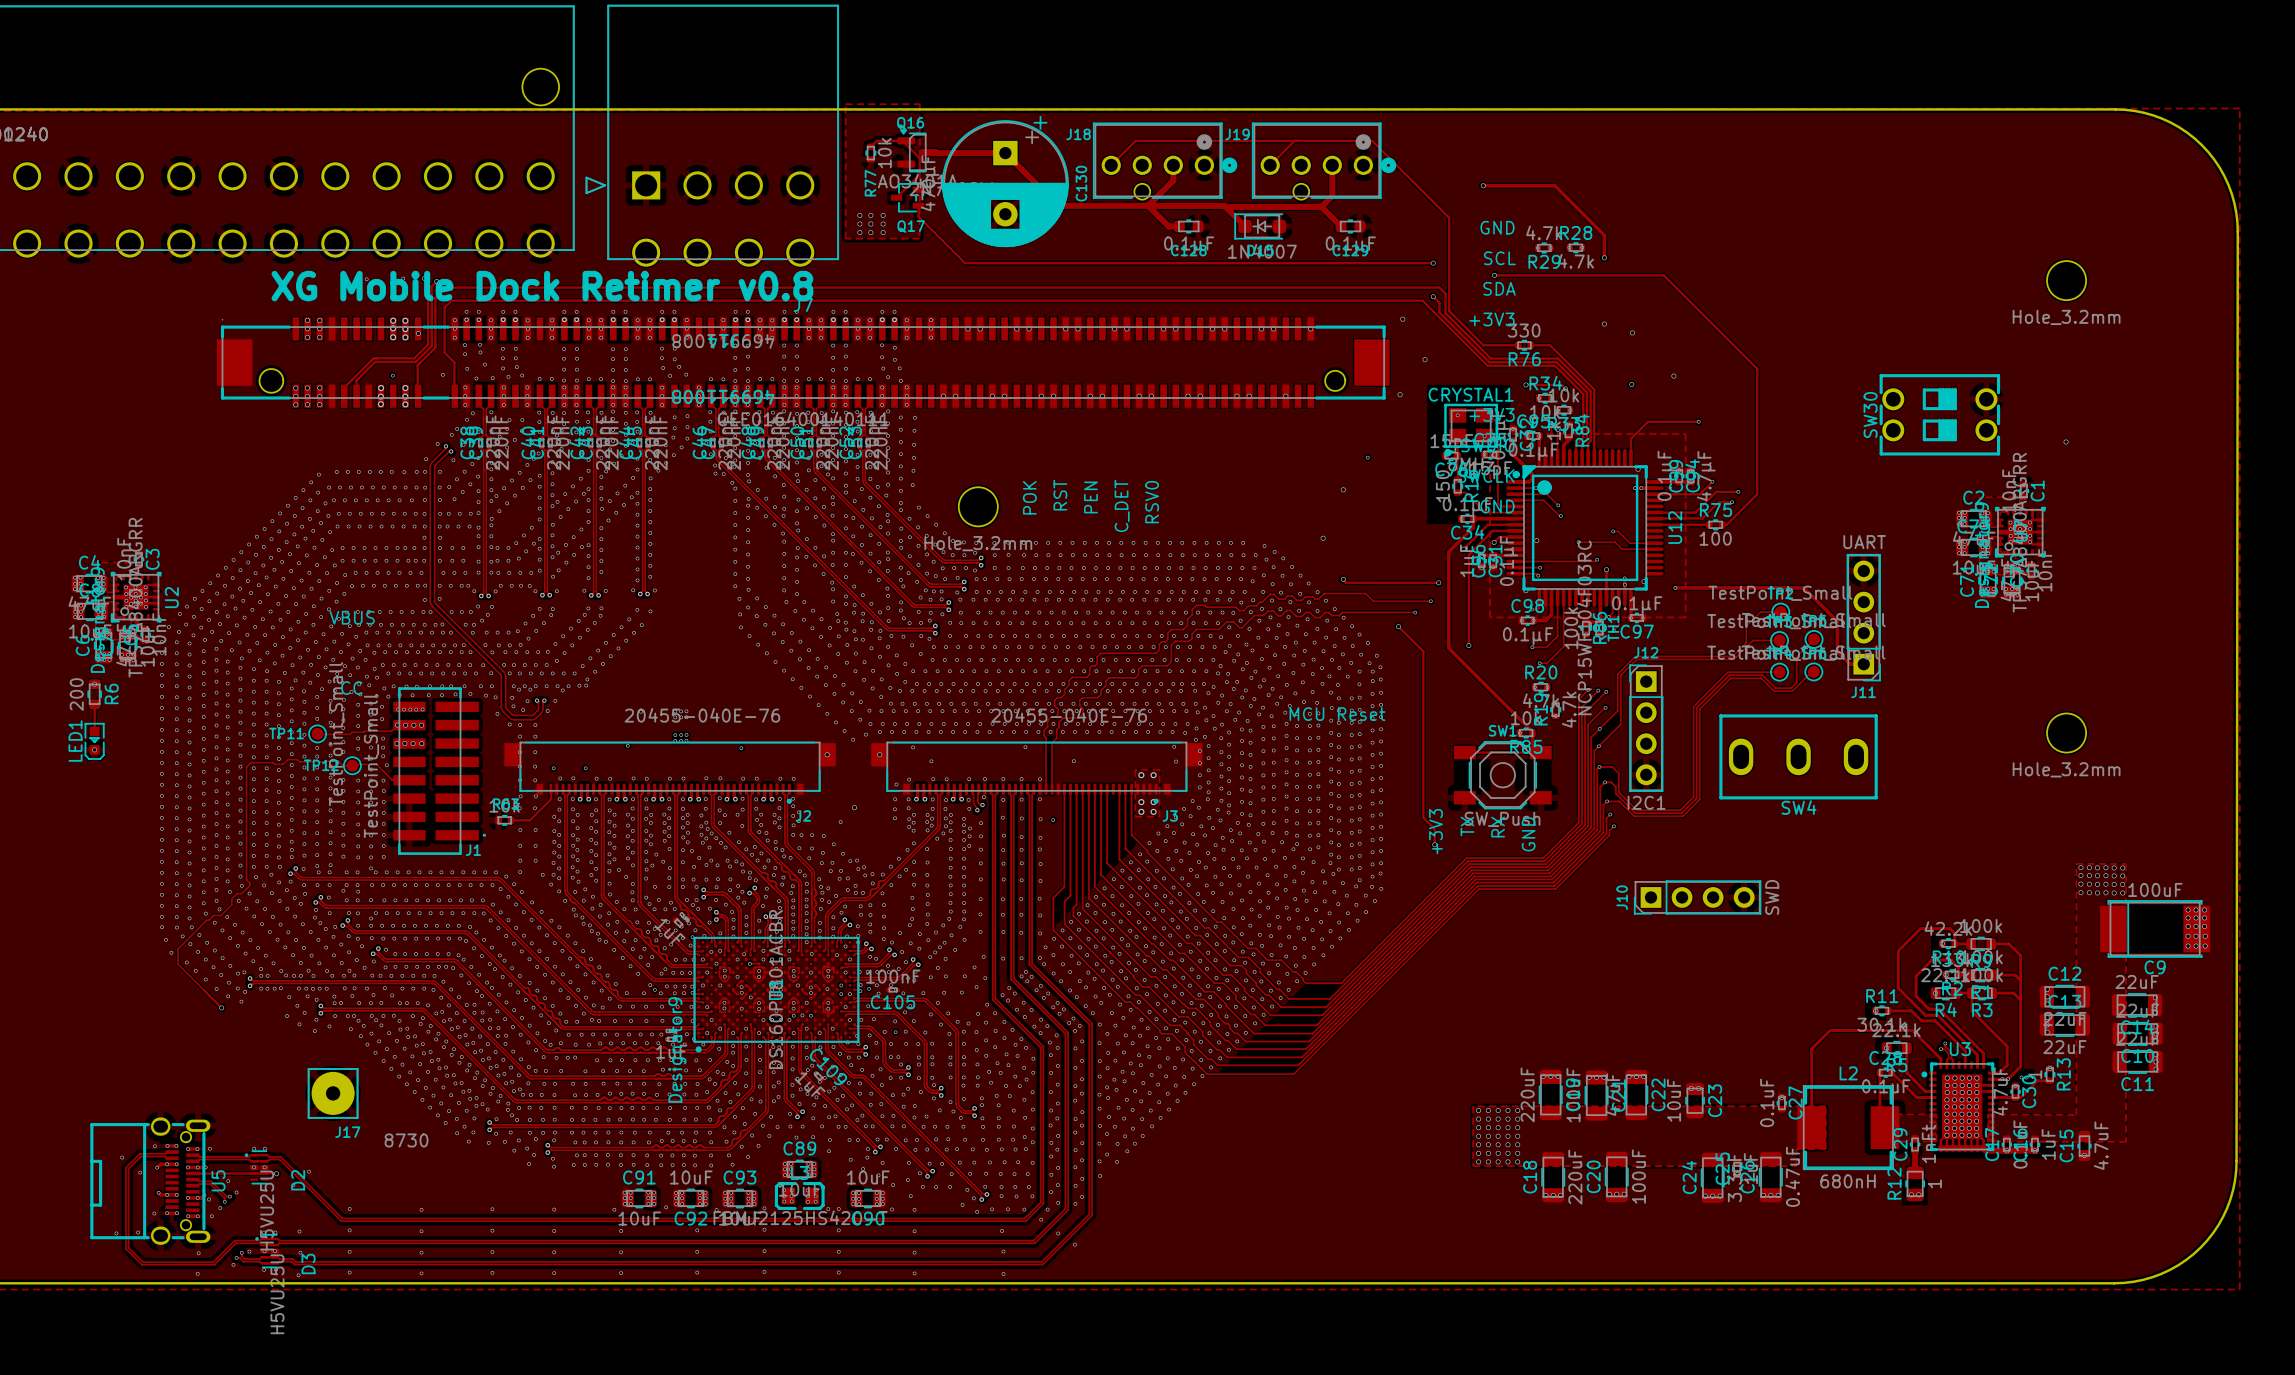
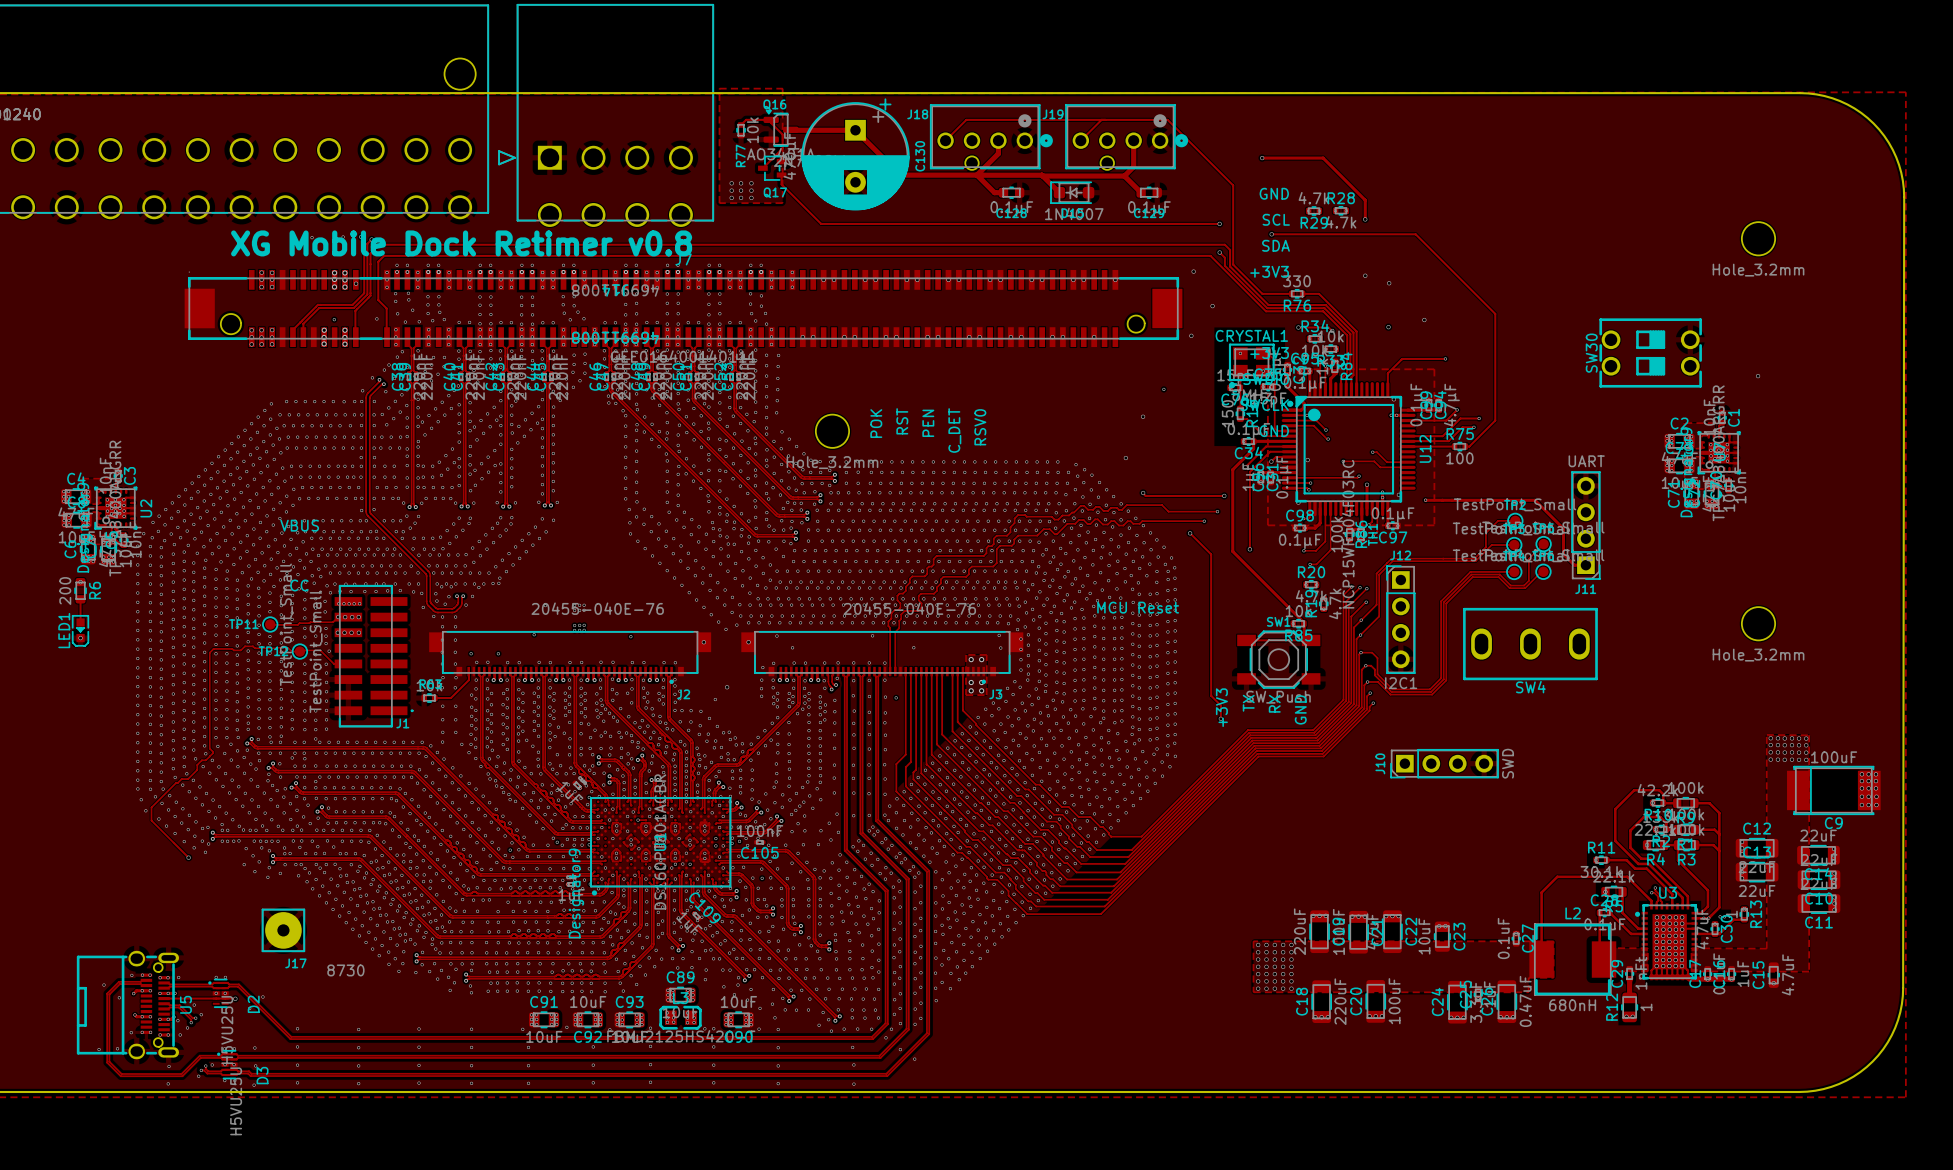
via: none -> (510, 850)

